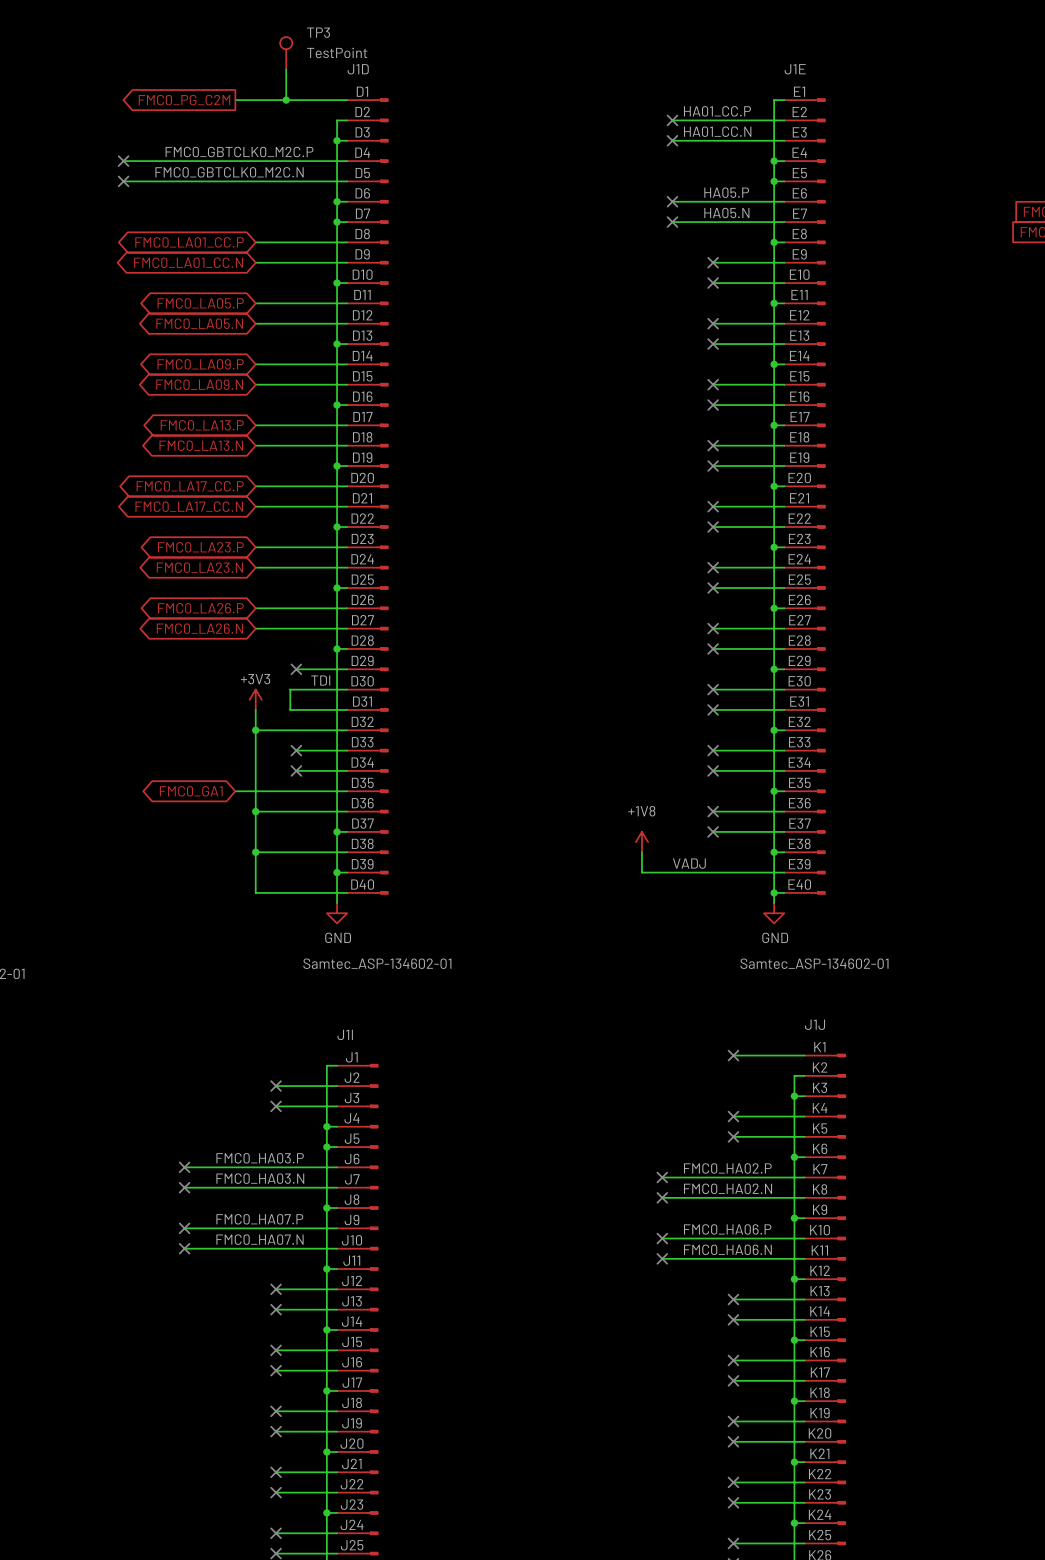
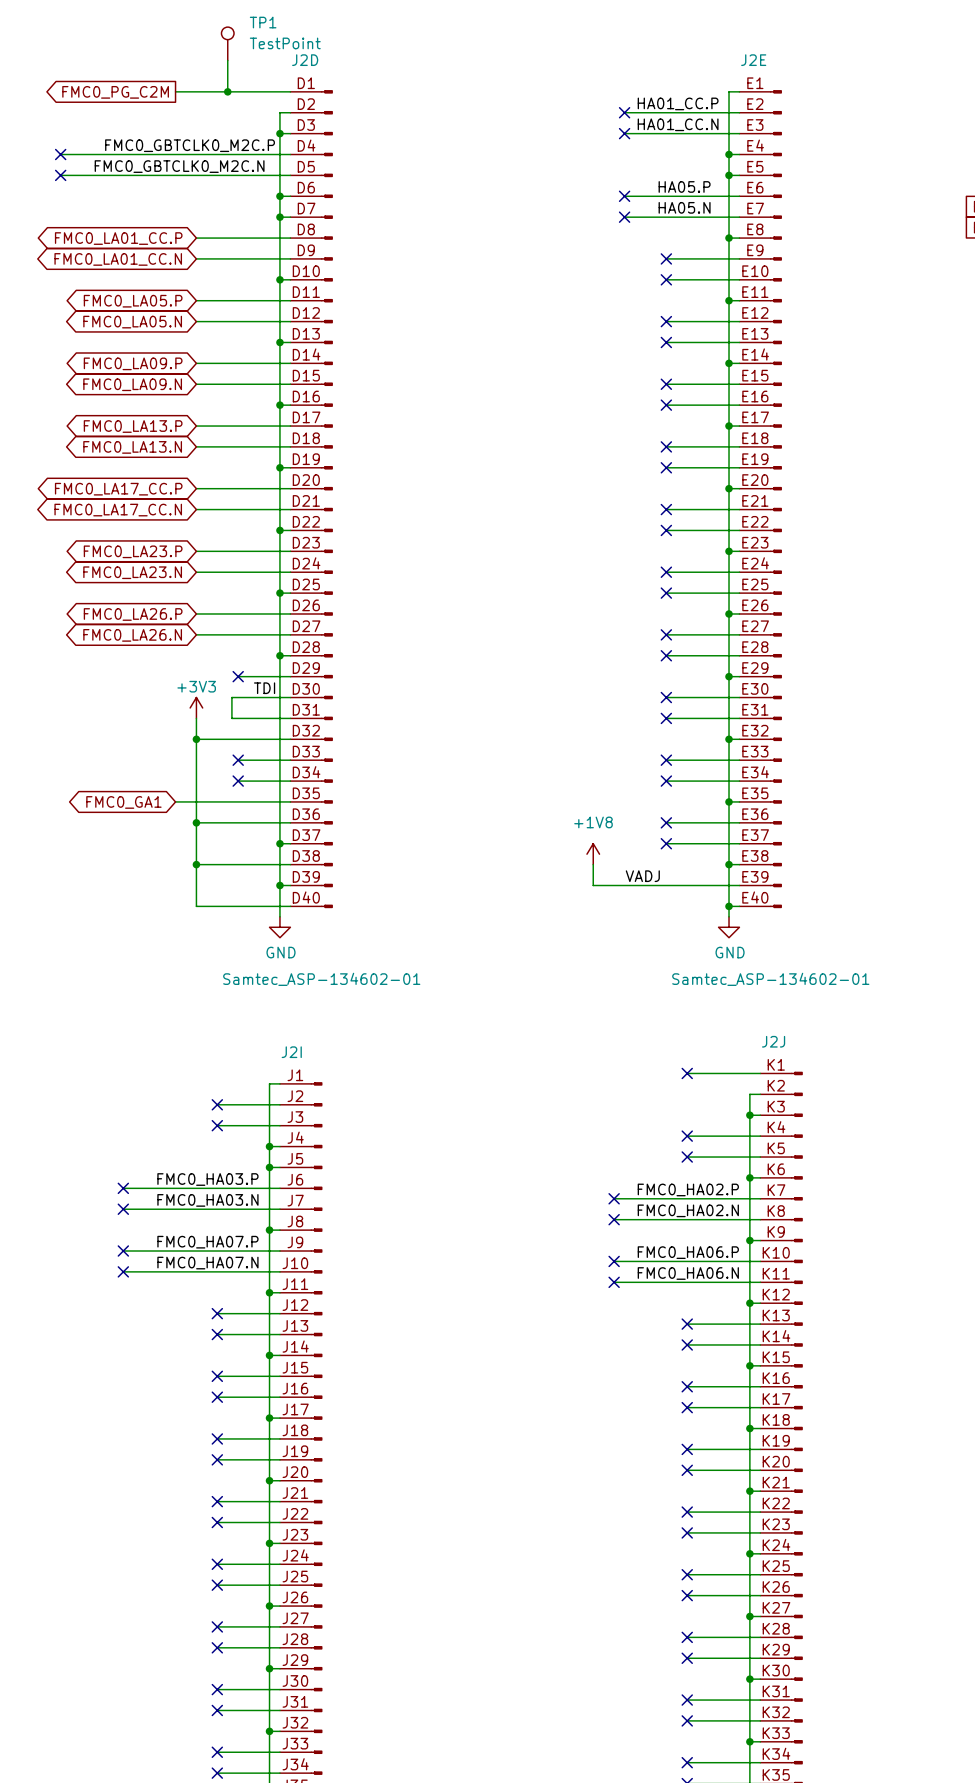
TP3 name: TP3 (318, 32) -> TP1 (263, 22)
J1D name: J1D (358, 69) -> J2D (305, 60)
J1E name: J1E (795, 69) -> J2E (753, 60)
J1J name: J1J (815, 1024) -> J2J (773, 1041)
J1I name: J1I (345, 1034) -> J2I (291, 1052)

